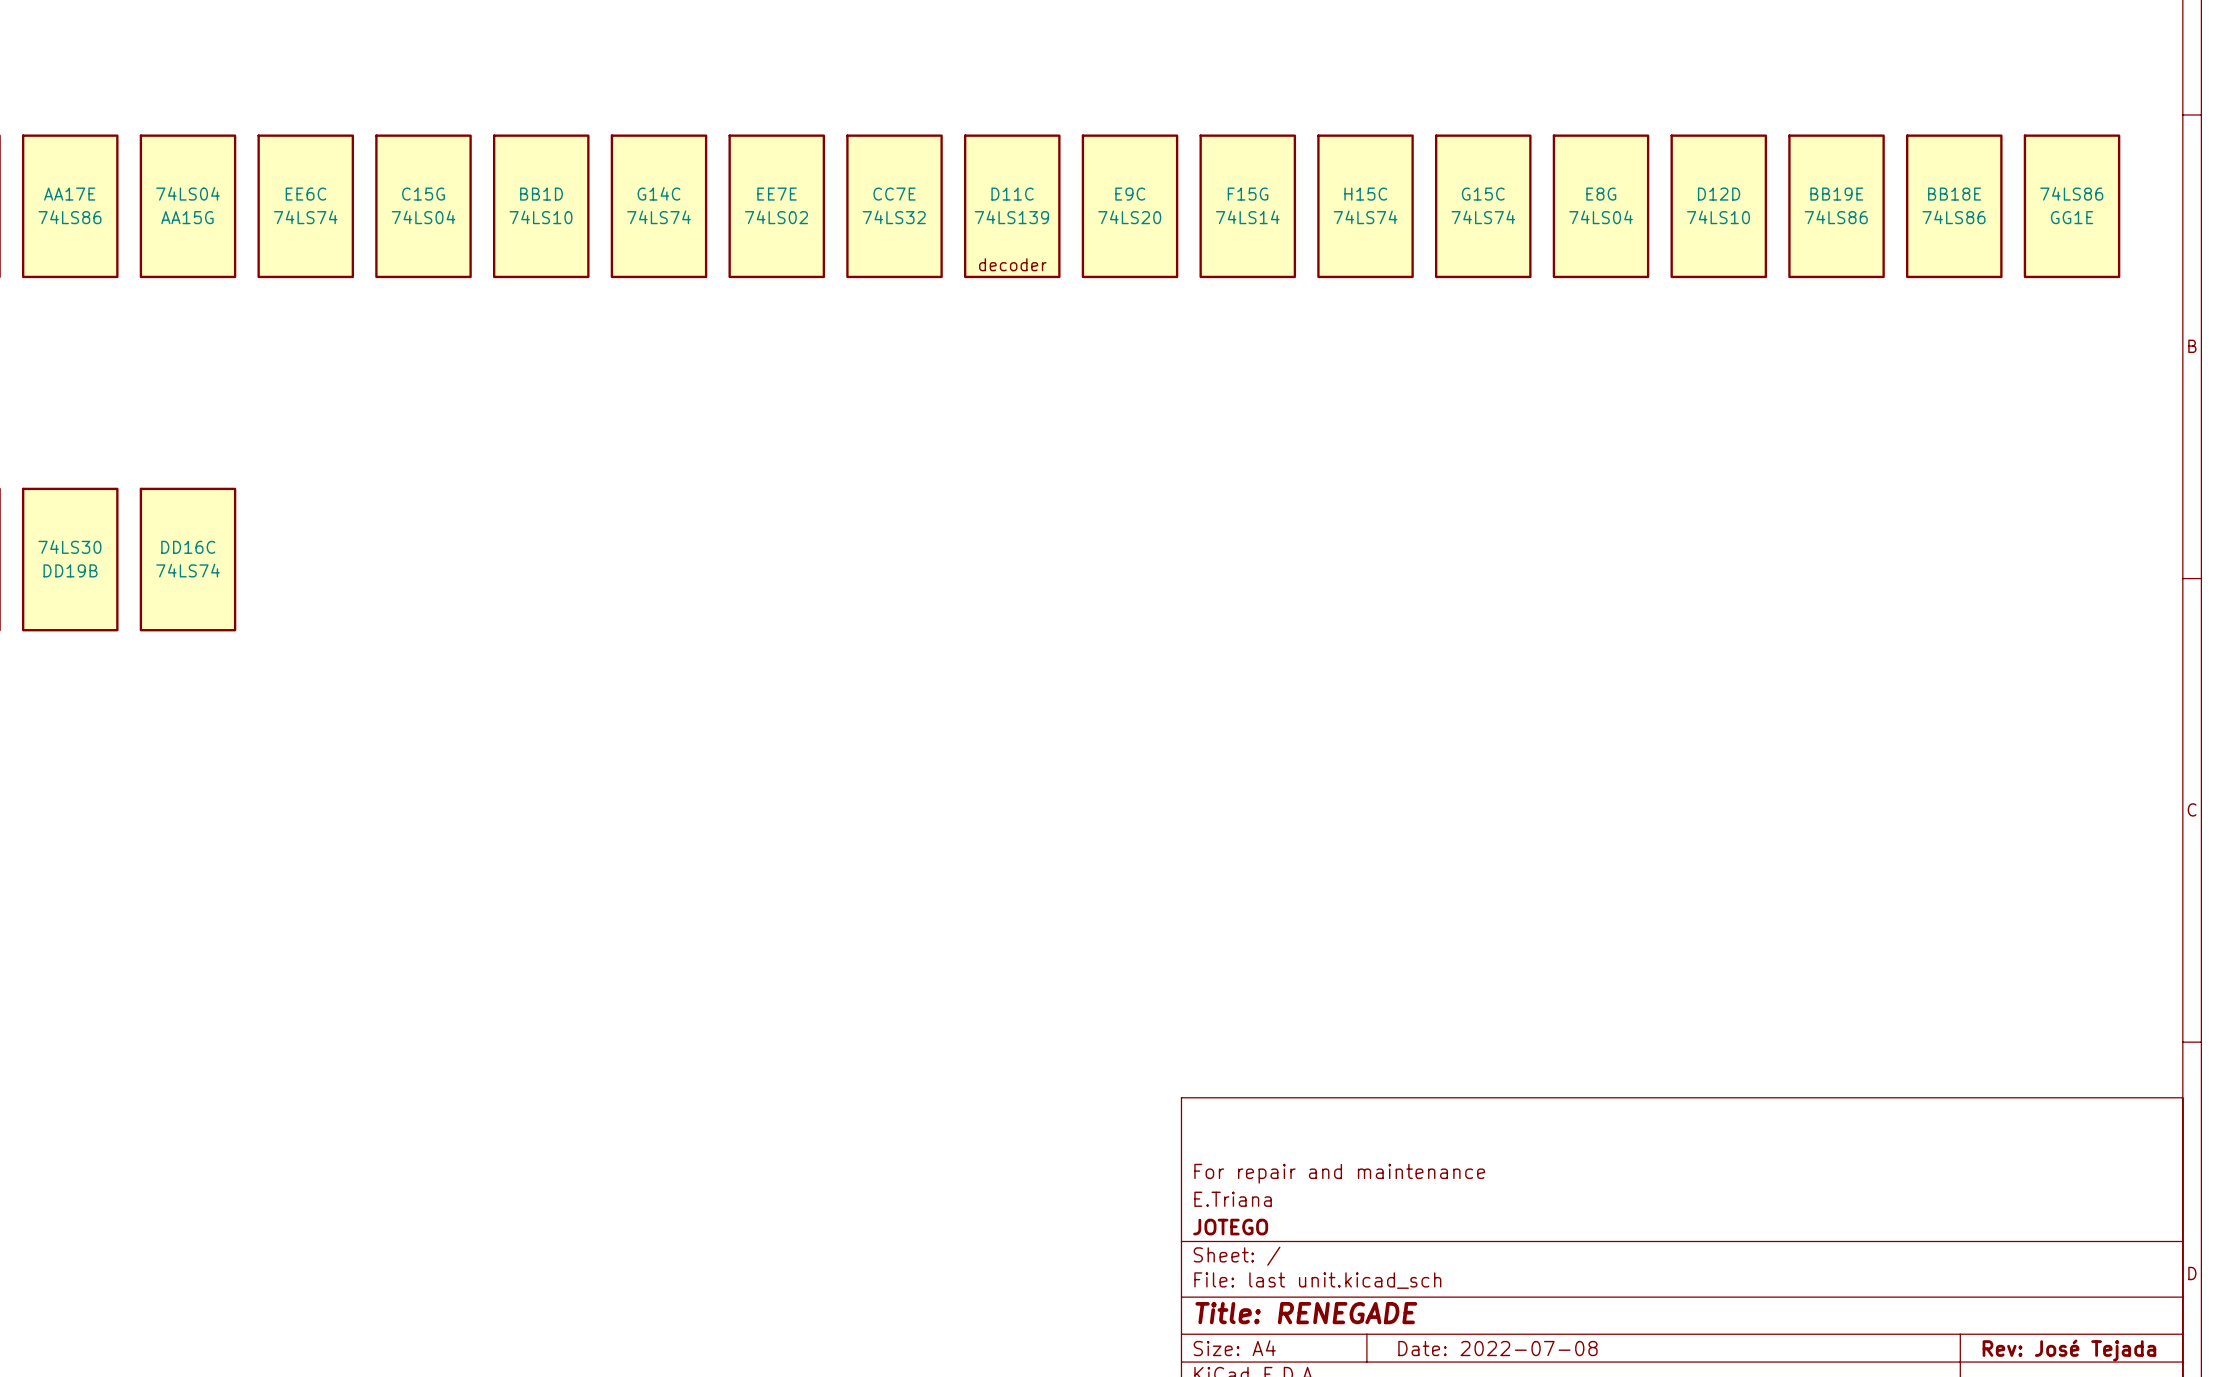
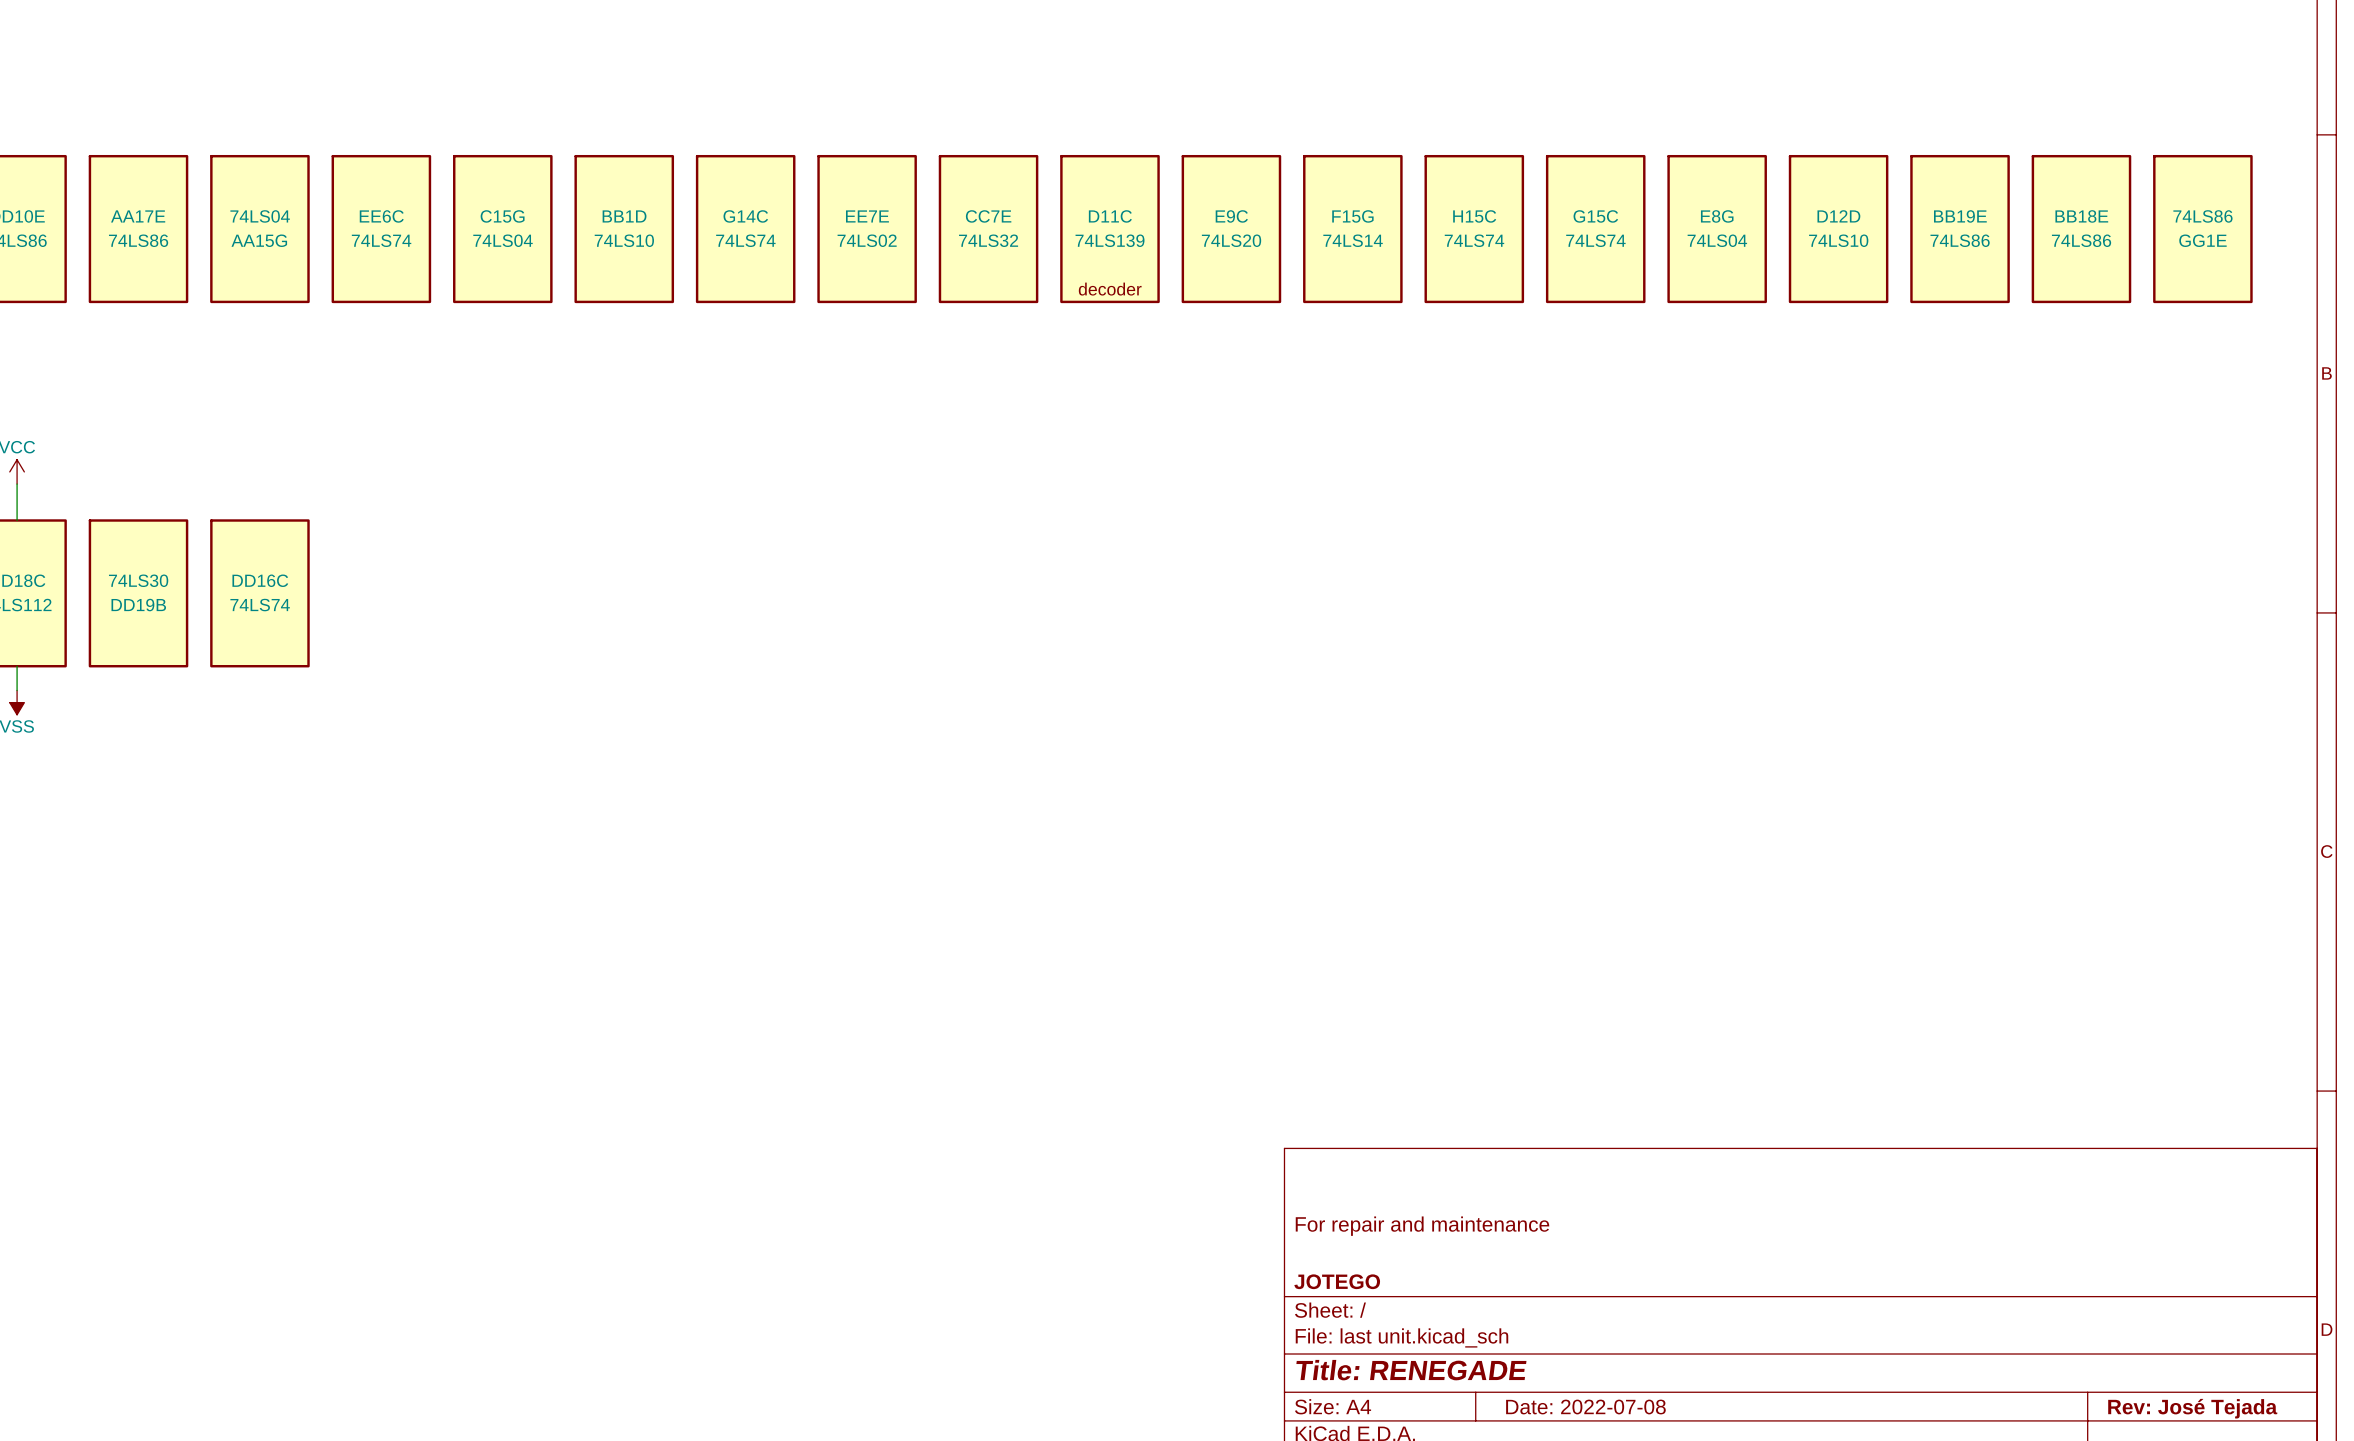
title block: E.Triana (1233, 1199) -> none

